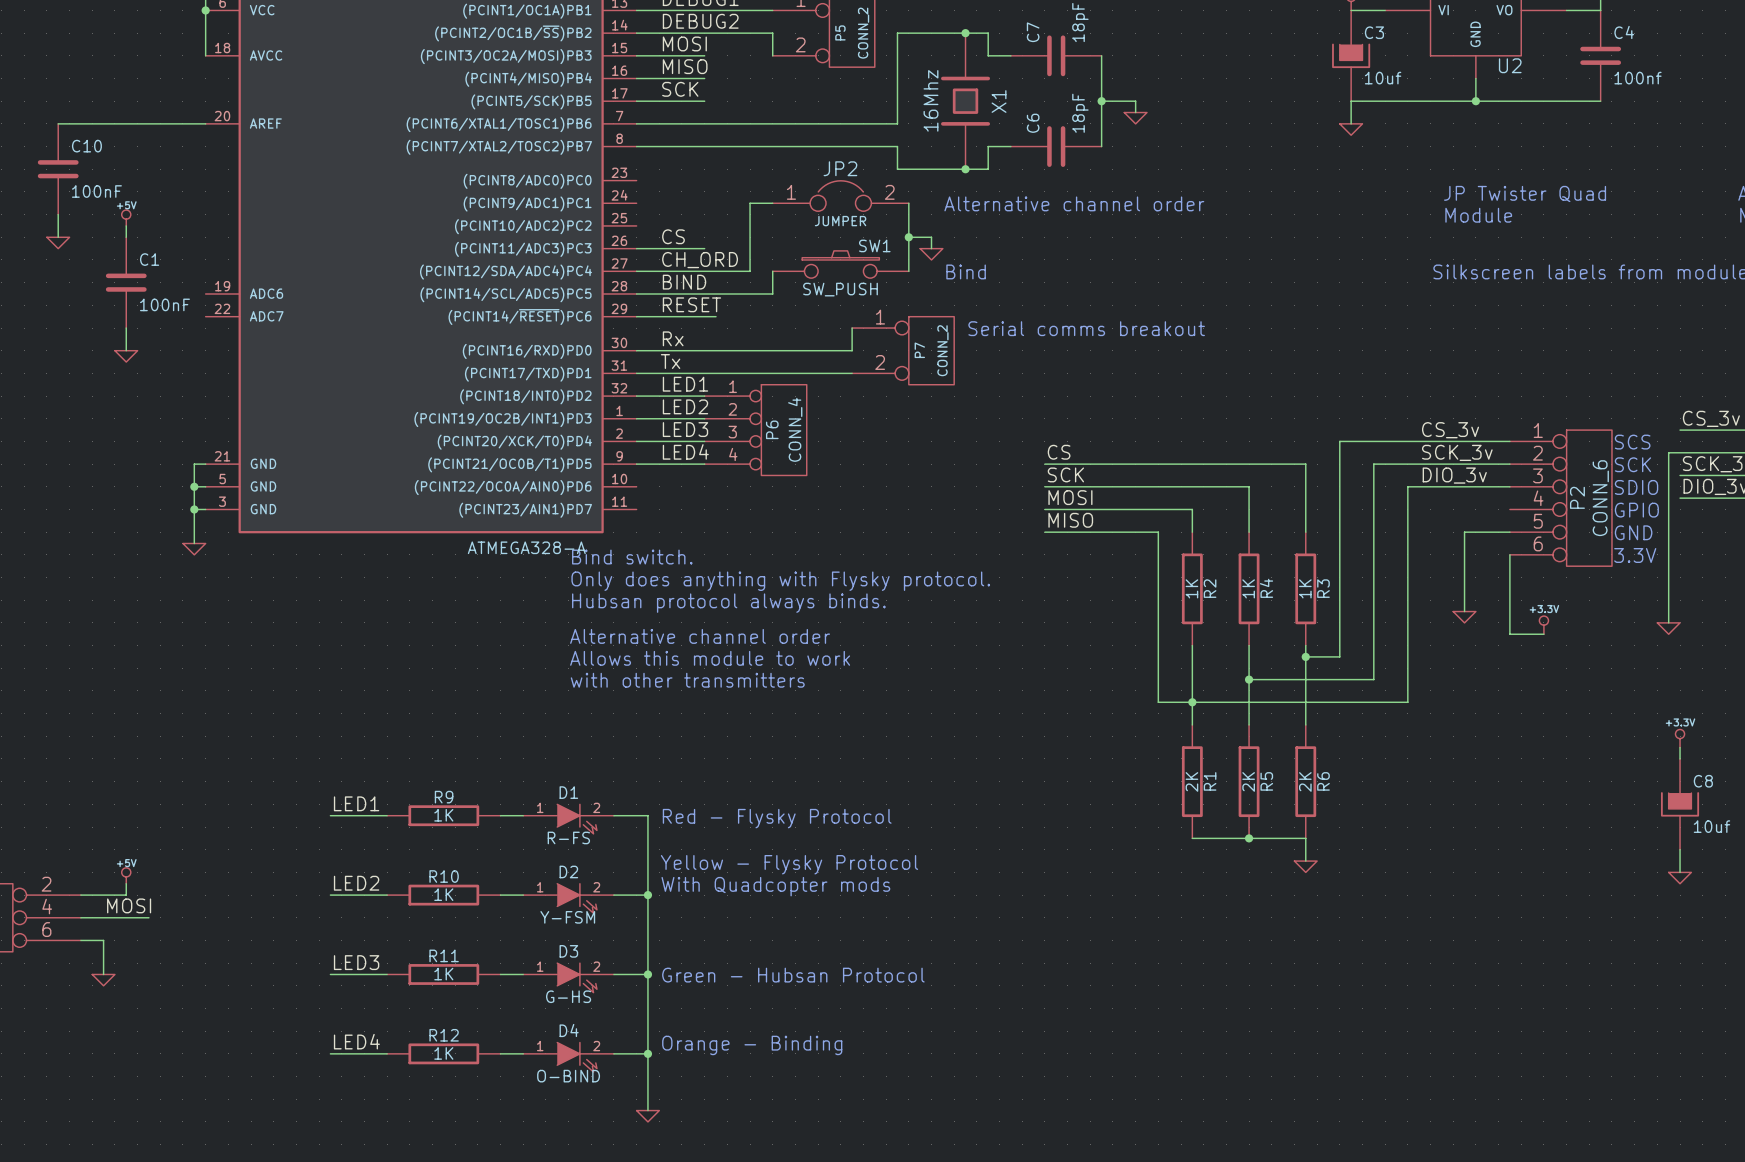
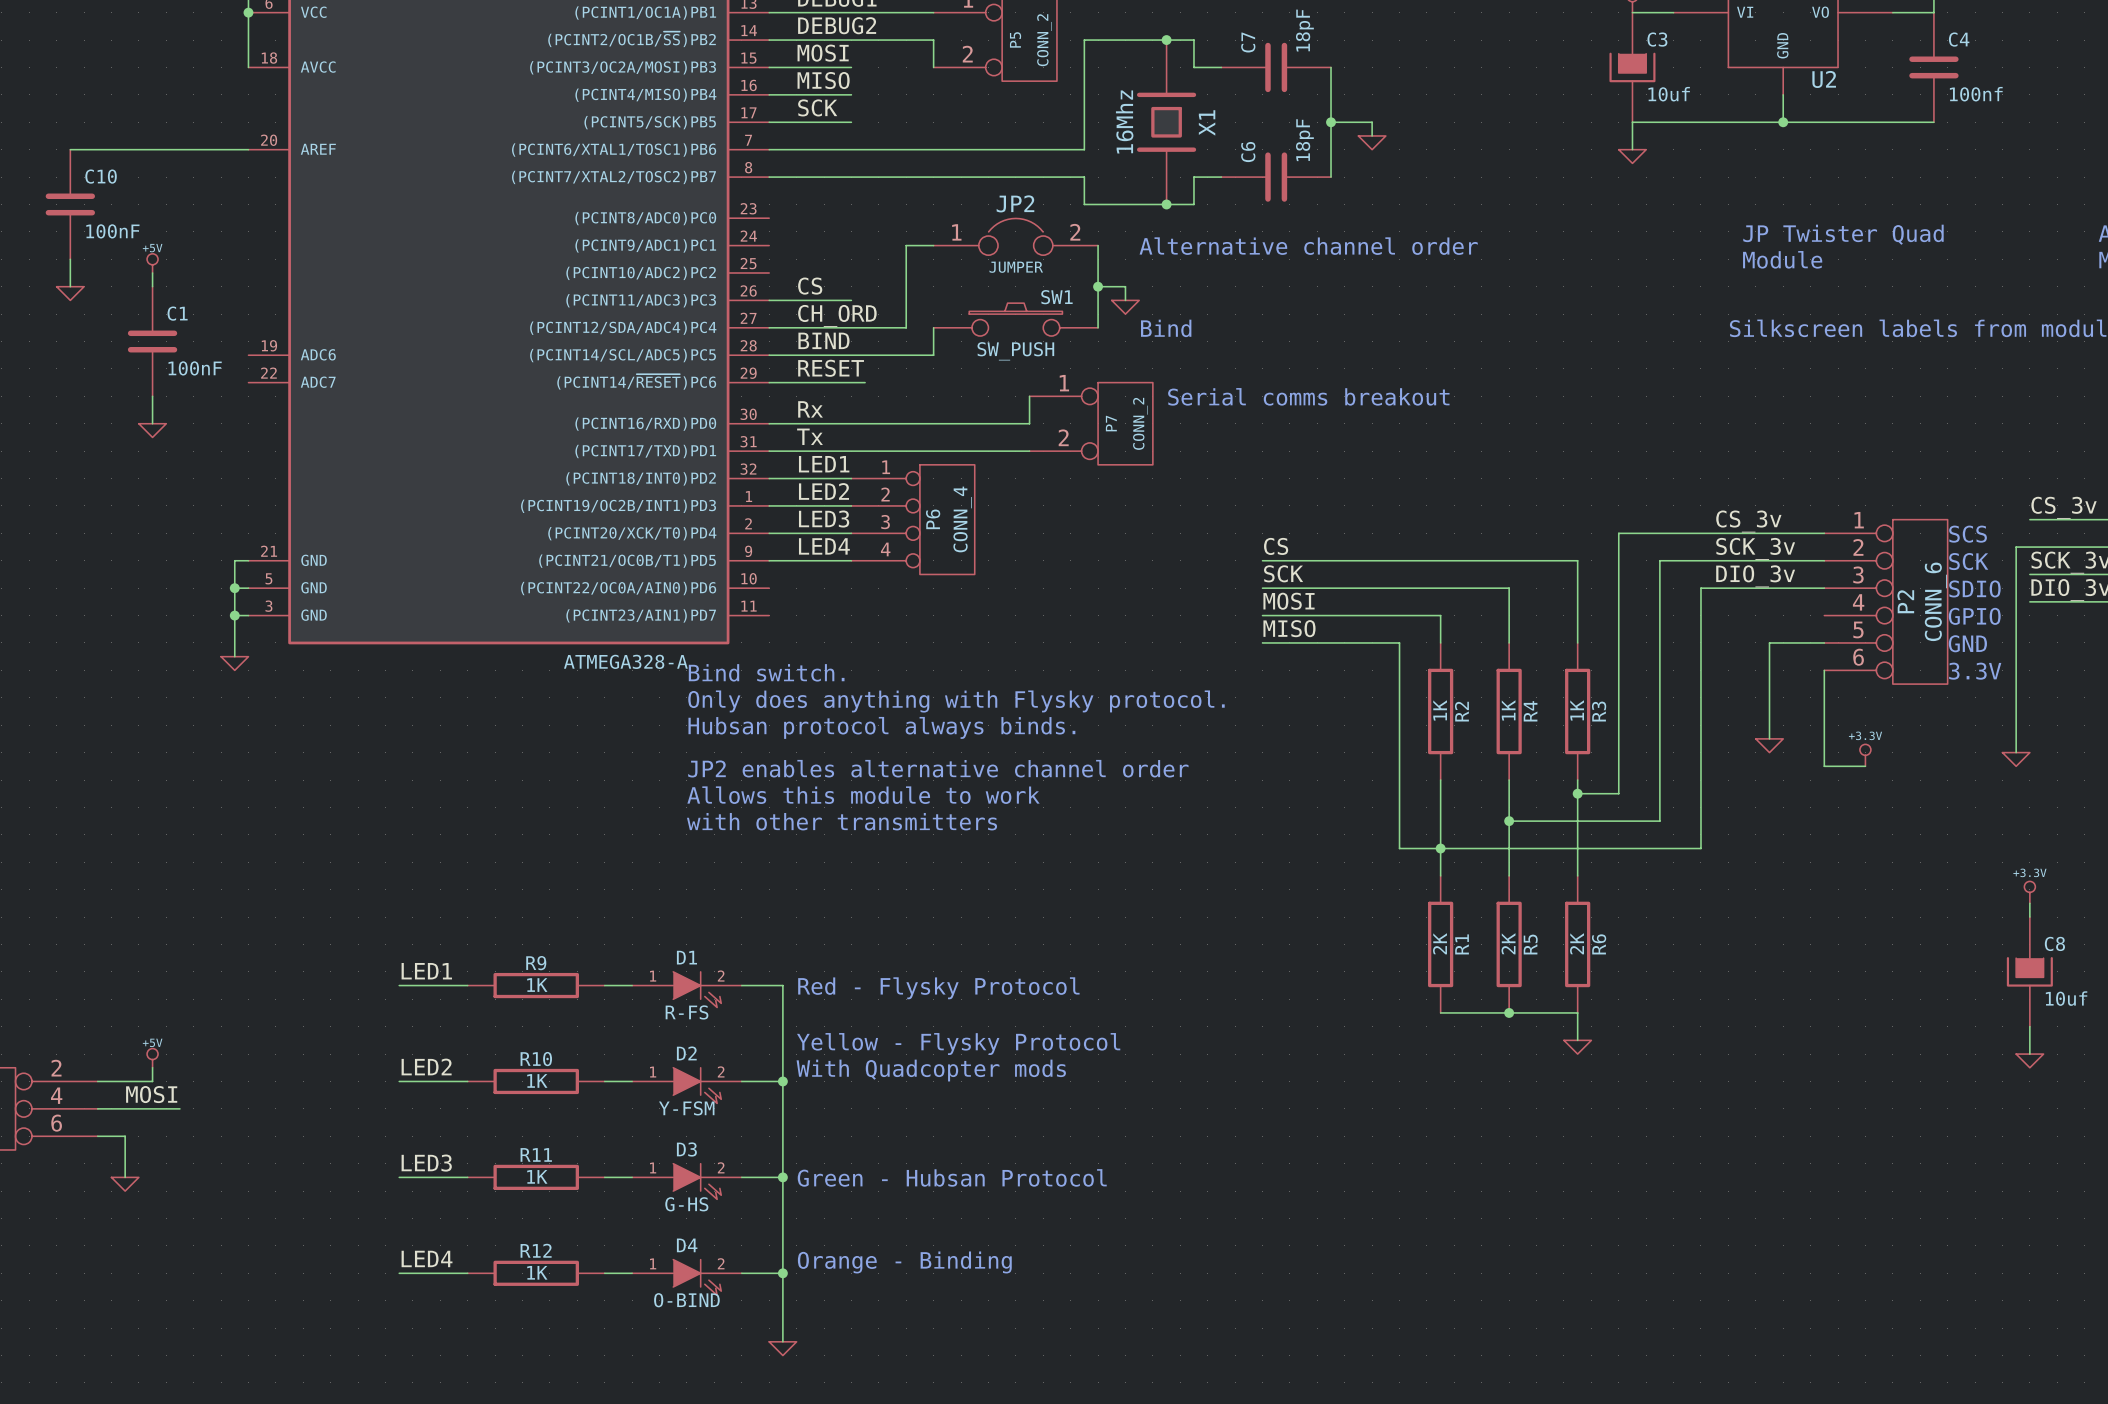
text: Alternative channel order (700, 636) -> JP2 enables alternative channel order (938, 768)

